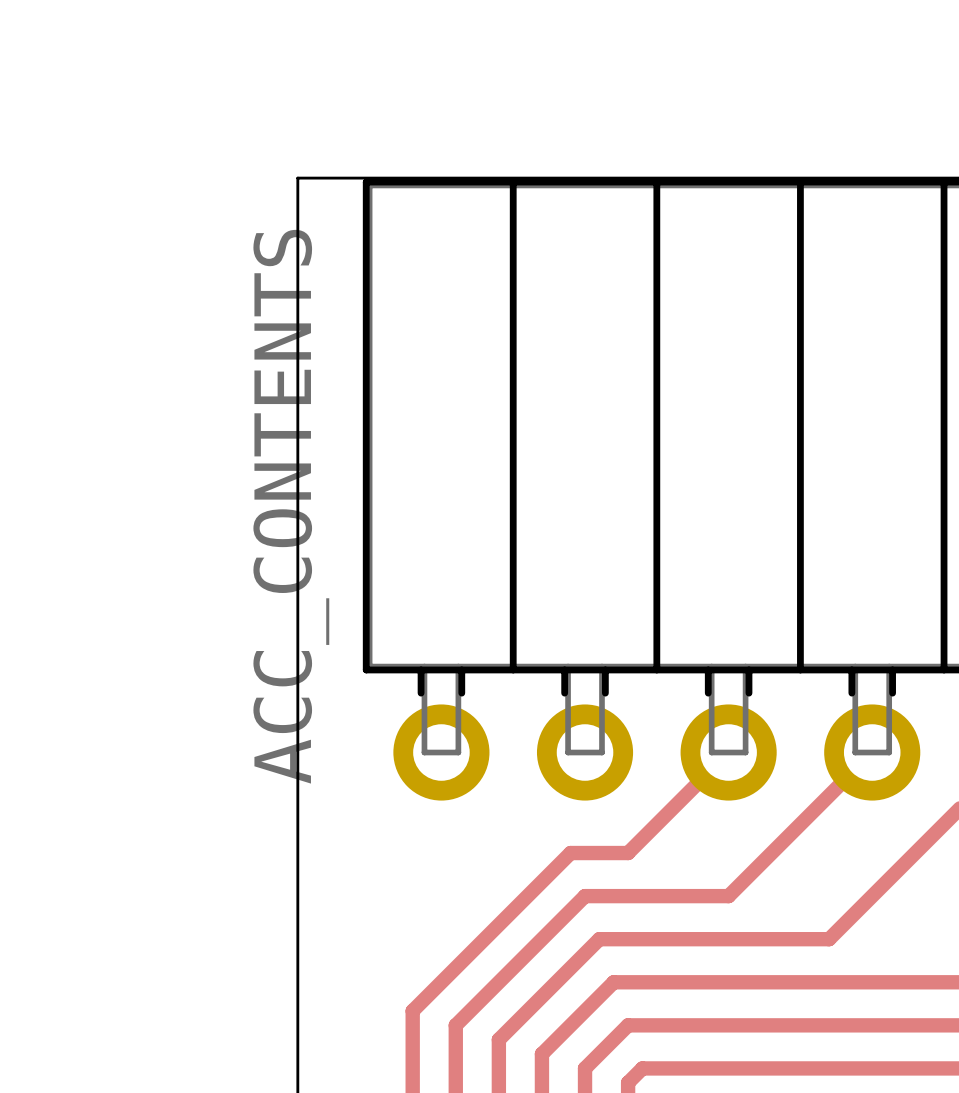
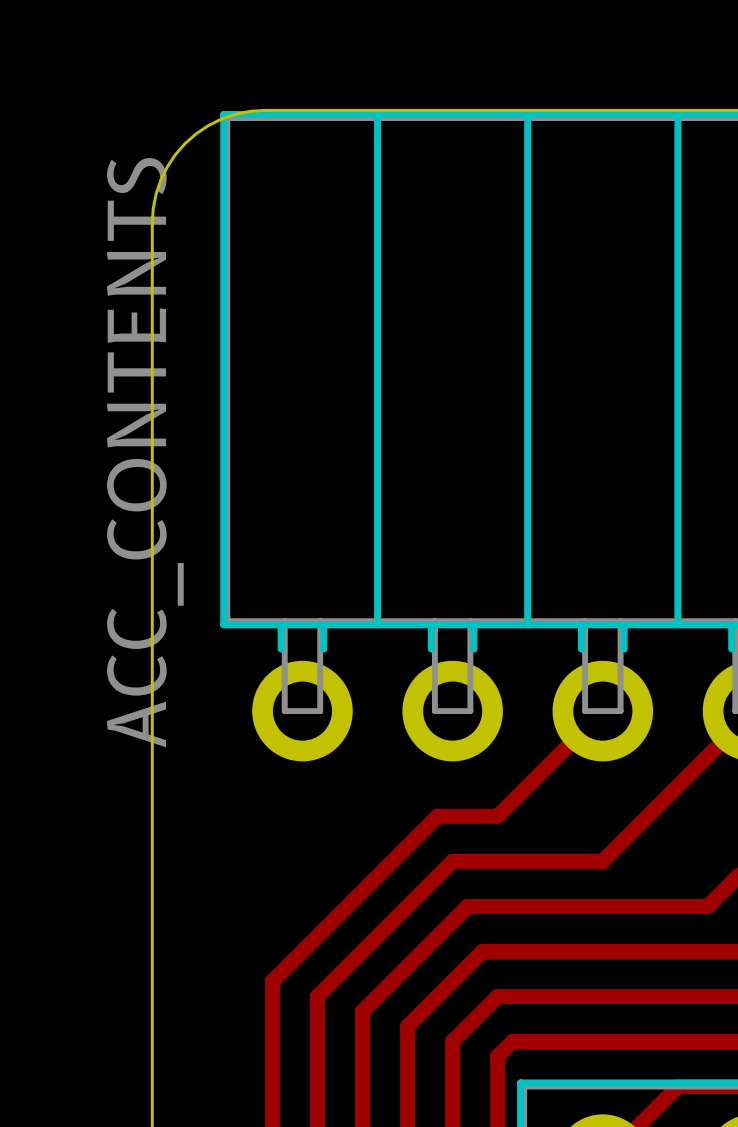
board edge: (405, 178) (297, 178) (297, 285) -> (264, 110) (250, 111) (221, 118) (208, 125) (185, 143) (167, 166) (160, 179) (153, 208) (152, 223)

